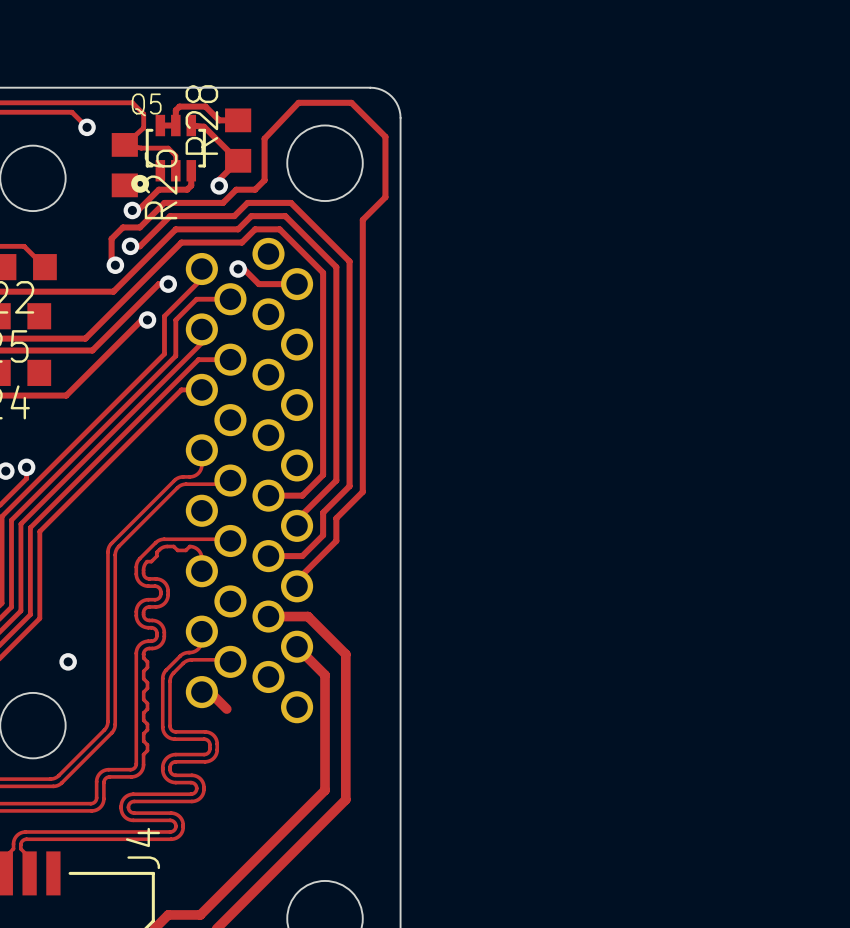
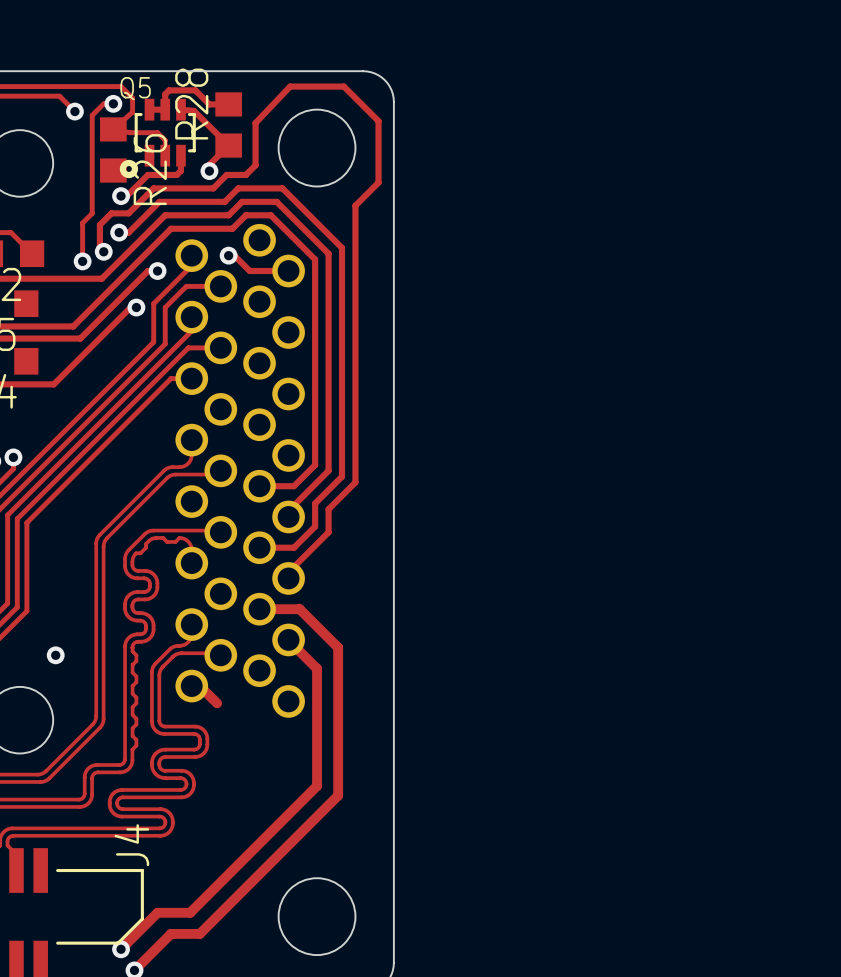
track: none -> (113, 103) (103, 103) (92, 115) (92, 213) (82, 222) (82, 261)
via: none -> (113, 103)
via: none -> (82, 261)

